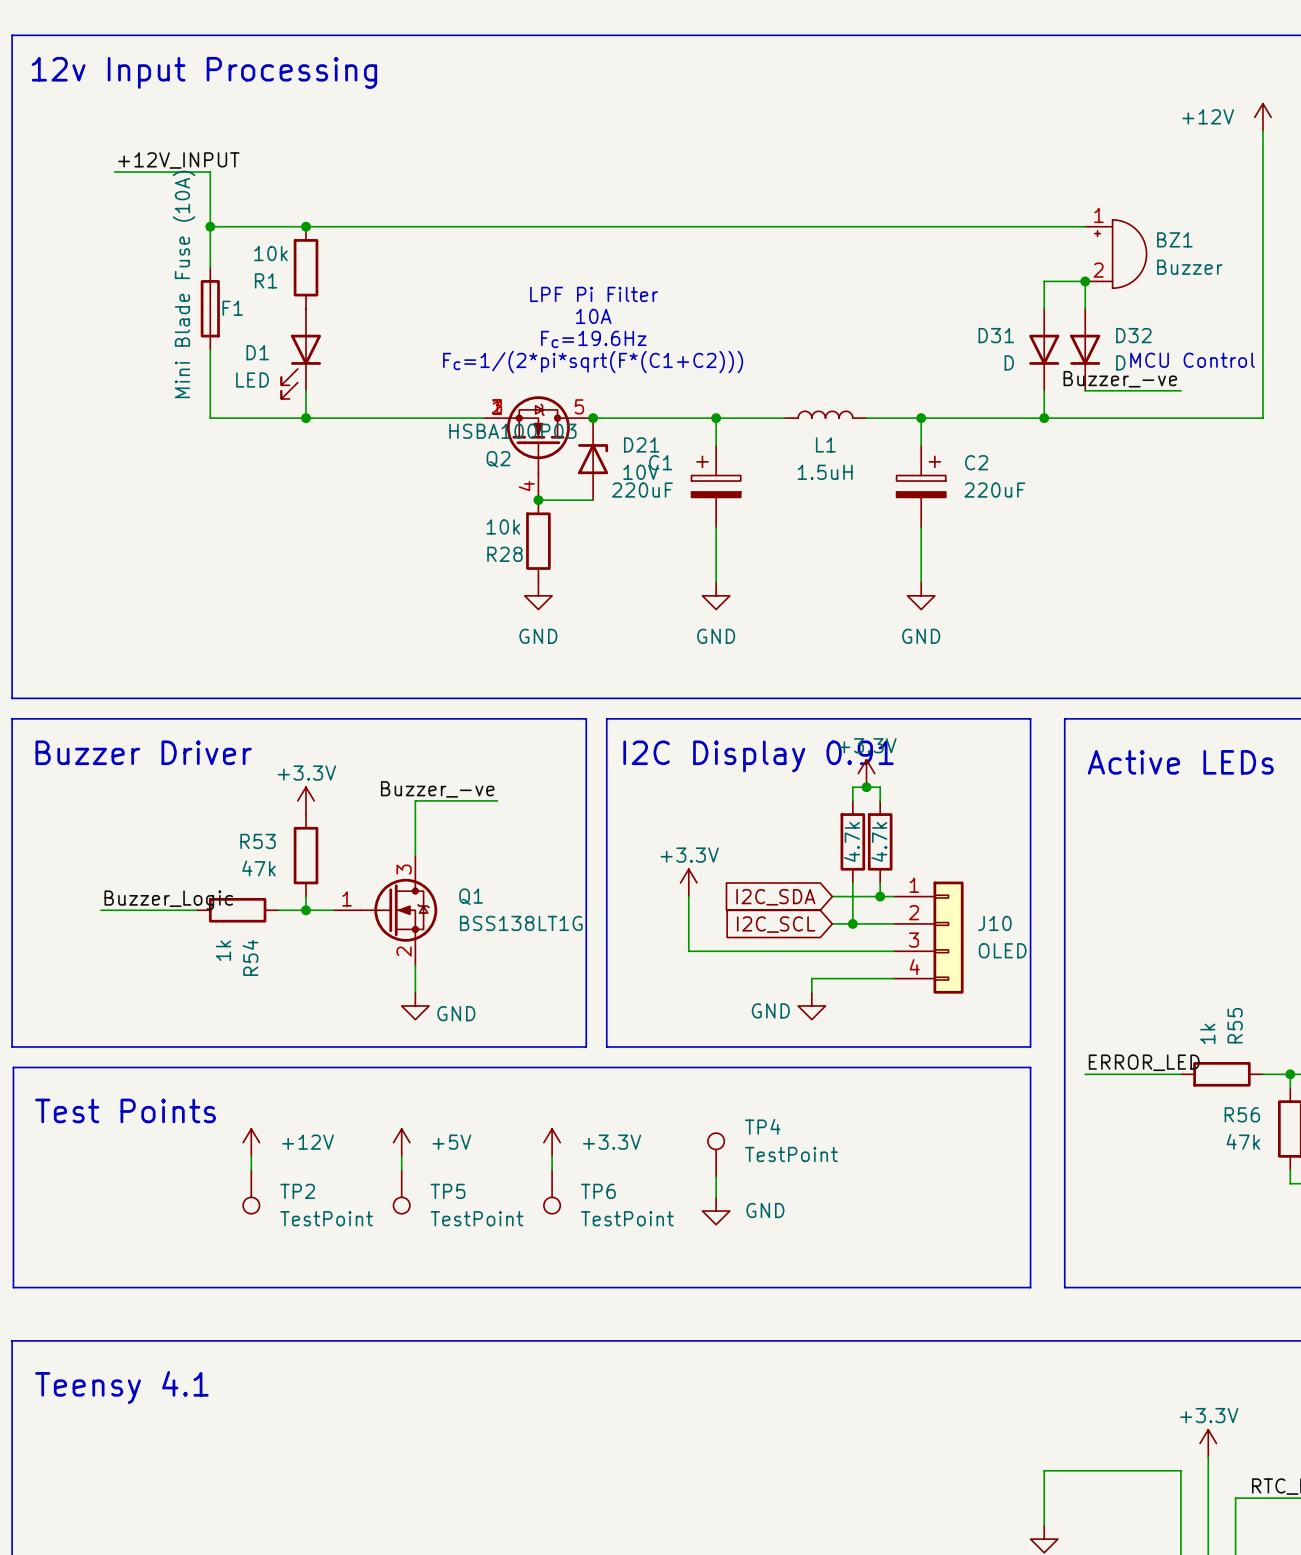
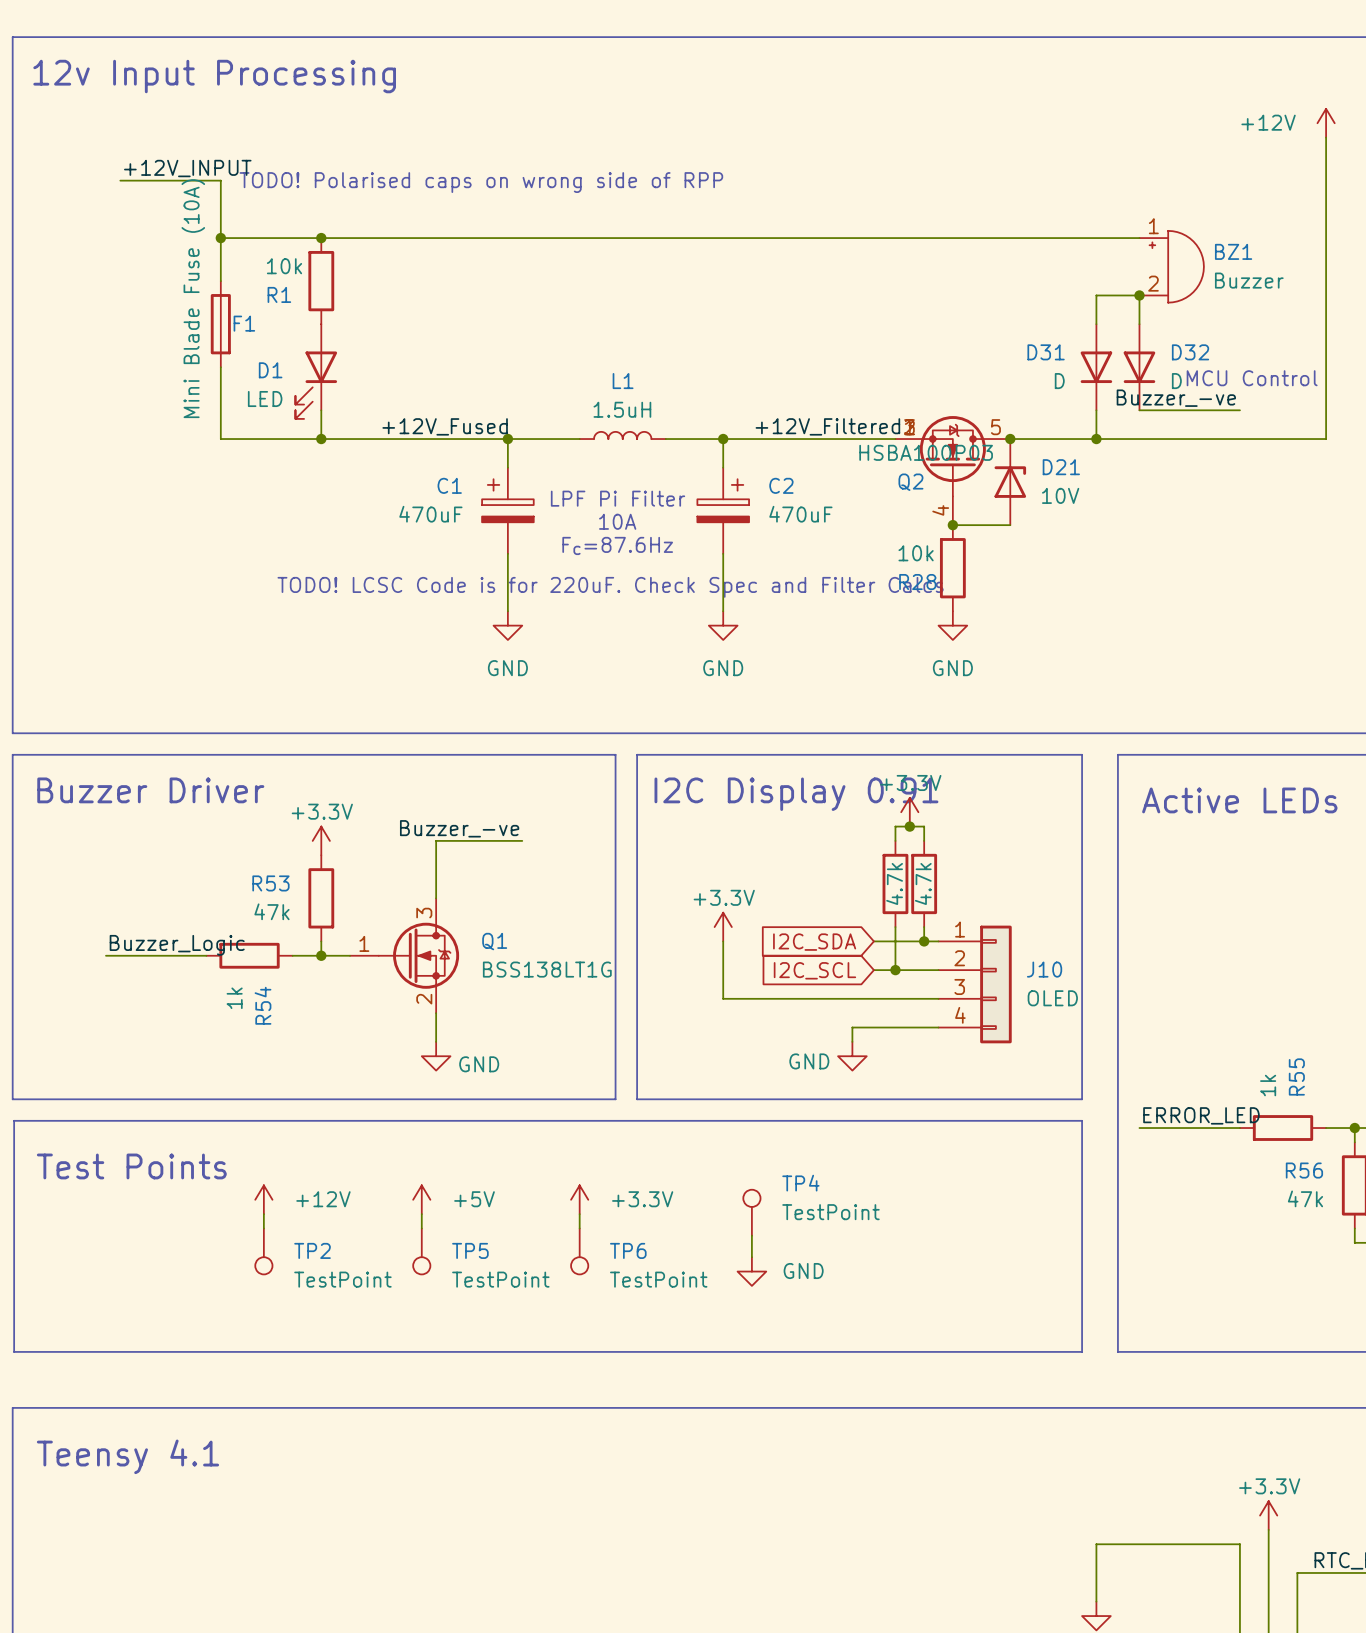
text: none -> TODO! Polarised caps on wrong side of RPP (481, 182)
text position: LPF Pi Filter (594, 294) -> LPF Pi Filter (618, 498)
text position: 10A (593, 316) -> 10A (617, 521)
text: Fc=19.6Hz (593, 339) -> none
text: Fc=1/(2*pi*sqrt(F*(C1+C2))) (593, 362) -> none
label: none -> +12V_Fused (445, 426)
label: none -> +12V_Filtered (827, 426)
L1 position: (825, 414) -> (622, 435)
junction: none -> (507, 439)
wire: (593, 418) (634, 418) -> none
junction: (593, 418) -> none
wire: (716, 418) (716, 445) -> none
junction position: (716, 418) -> (723, 439)
wire: none -> (823, 439) (895, 439)
wire: (921, 418) (921, 445) -> (723, 439) (723, 467)
junction position: (921, 418) -> (1010, 439)
L1 name position: L1 (825, 444) -> L1 (623, 381)
Q2 position: (538, 448) -> (952, 470)
D21 position: (593, 459) -> (1010, 482)
L1 value position: 1.5uH (825, 472) -> 1.5uH (622, 409)
C1 position: (716, 486) -> (507, 510)
C2 position: (921, 486) -> (723, 510)
C1 value: 220uF (642, 490) -> 470uF (430, 514)
C2 value: 220uF (994, 490) -> 470uF (800, 514)
wire: (538, 500) (593, 500) -> none
junction: (538, 500) -> none
wire: none -> (952, 525) (1010, 525)
junction: none -> (952, 525)
text: none -> Fc=87.6Hz (617, 545)
wire: (716, 527) (716, 582) -> (507, 553) (507, 611)
wire: (921, 527) (921, 582) -> (723, 553) (723, 611)
R28 position: (538, 541) -> (952, 568)
text: none -> TODO! LCSC Code is for 220uF. Check Spec and Filter Calcs (610, 587)
power symbol position: GND (538, 595) -> GND (507, 625)
power symbol position: GND (716, 595) -> GND (723, 625)
power symbol position: GND (921, 595) -> GND (952, 625)

